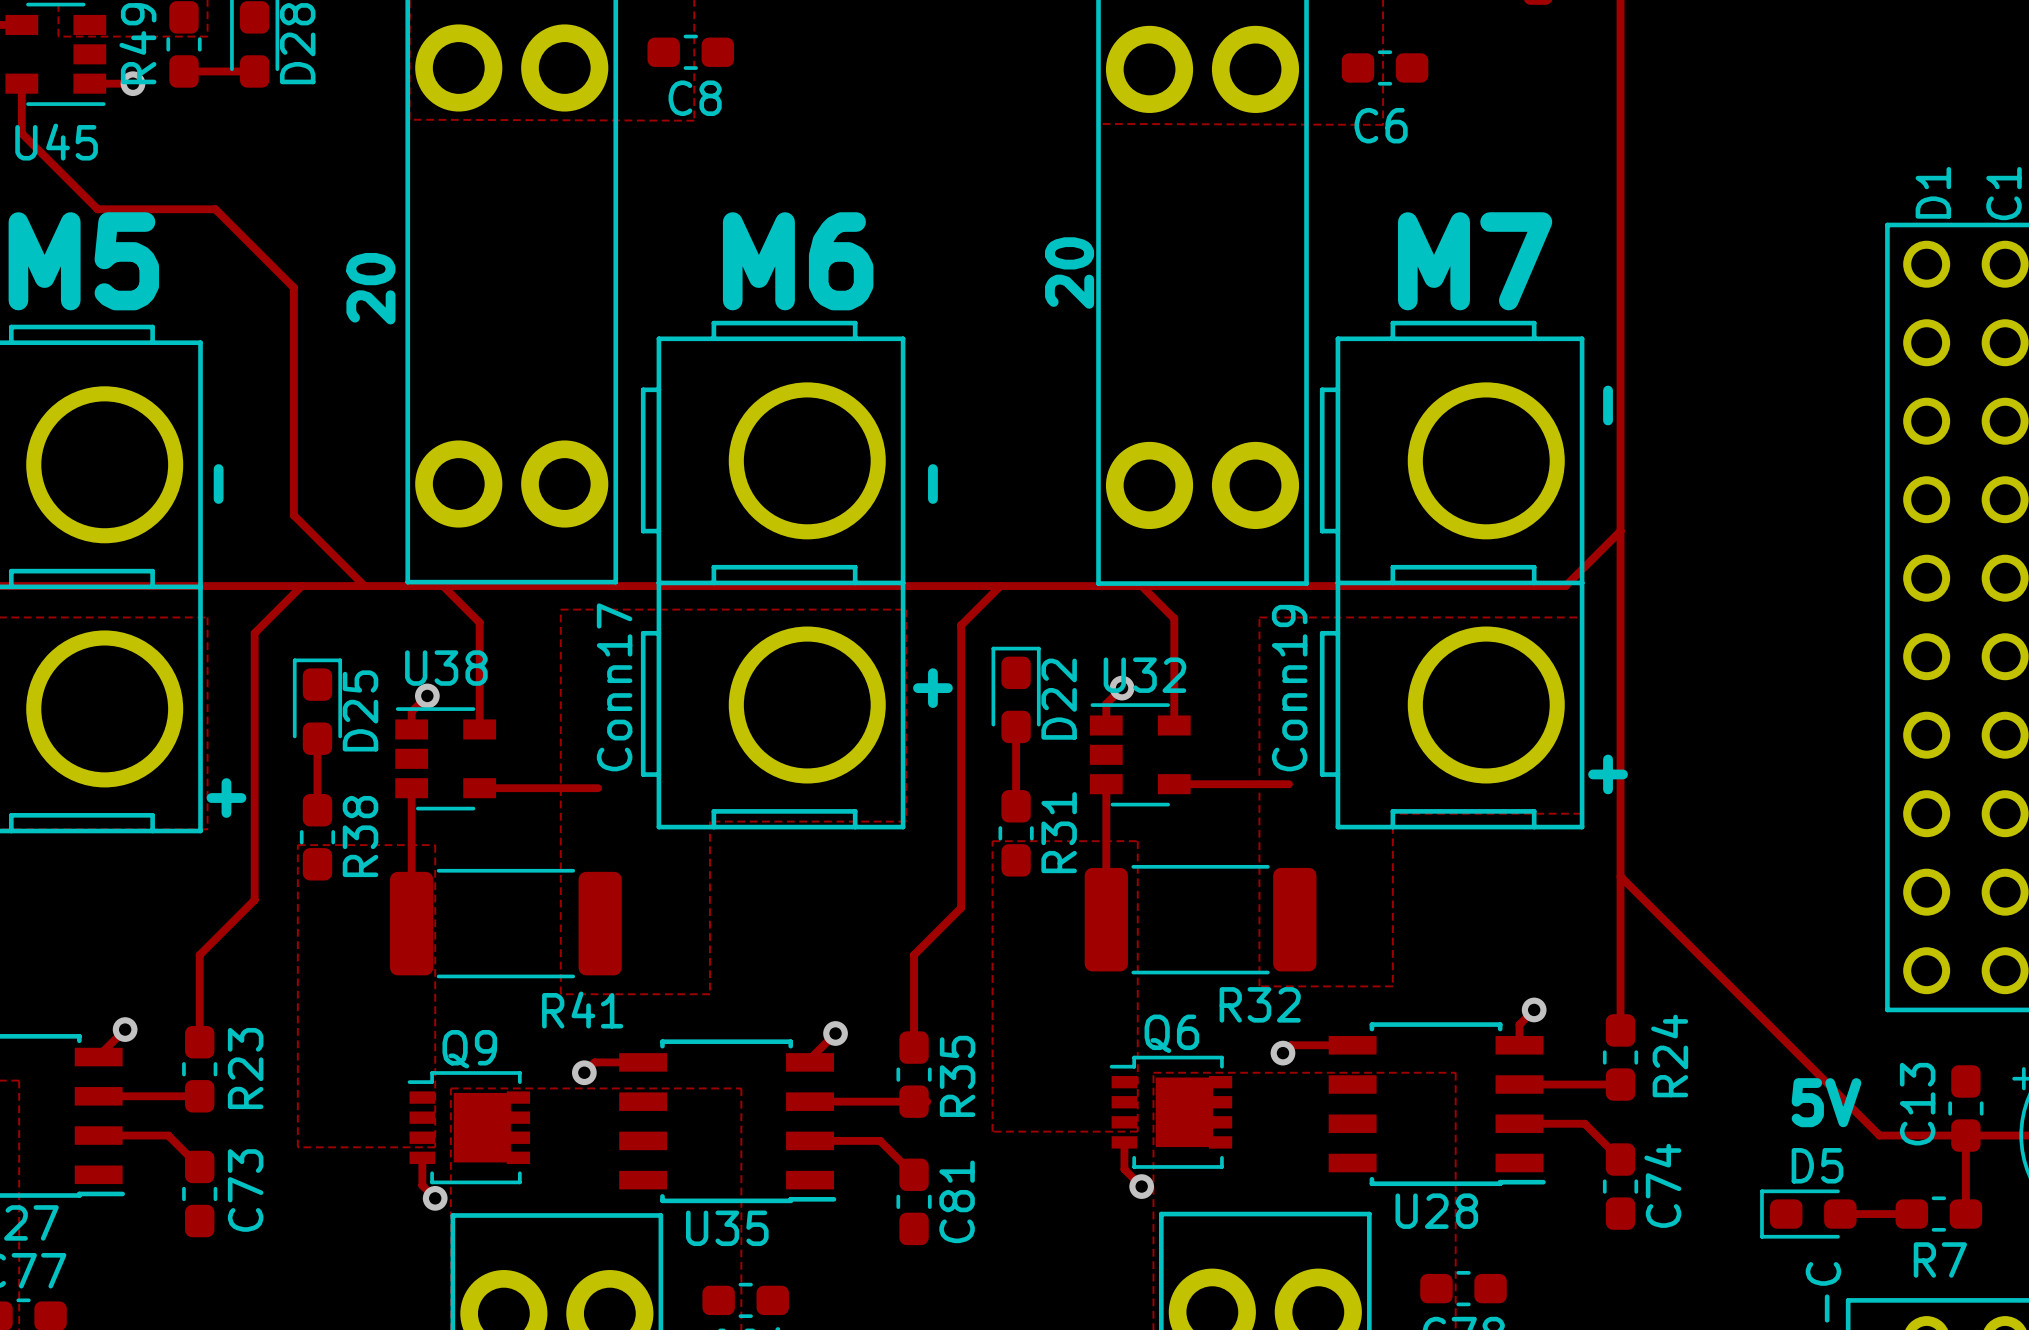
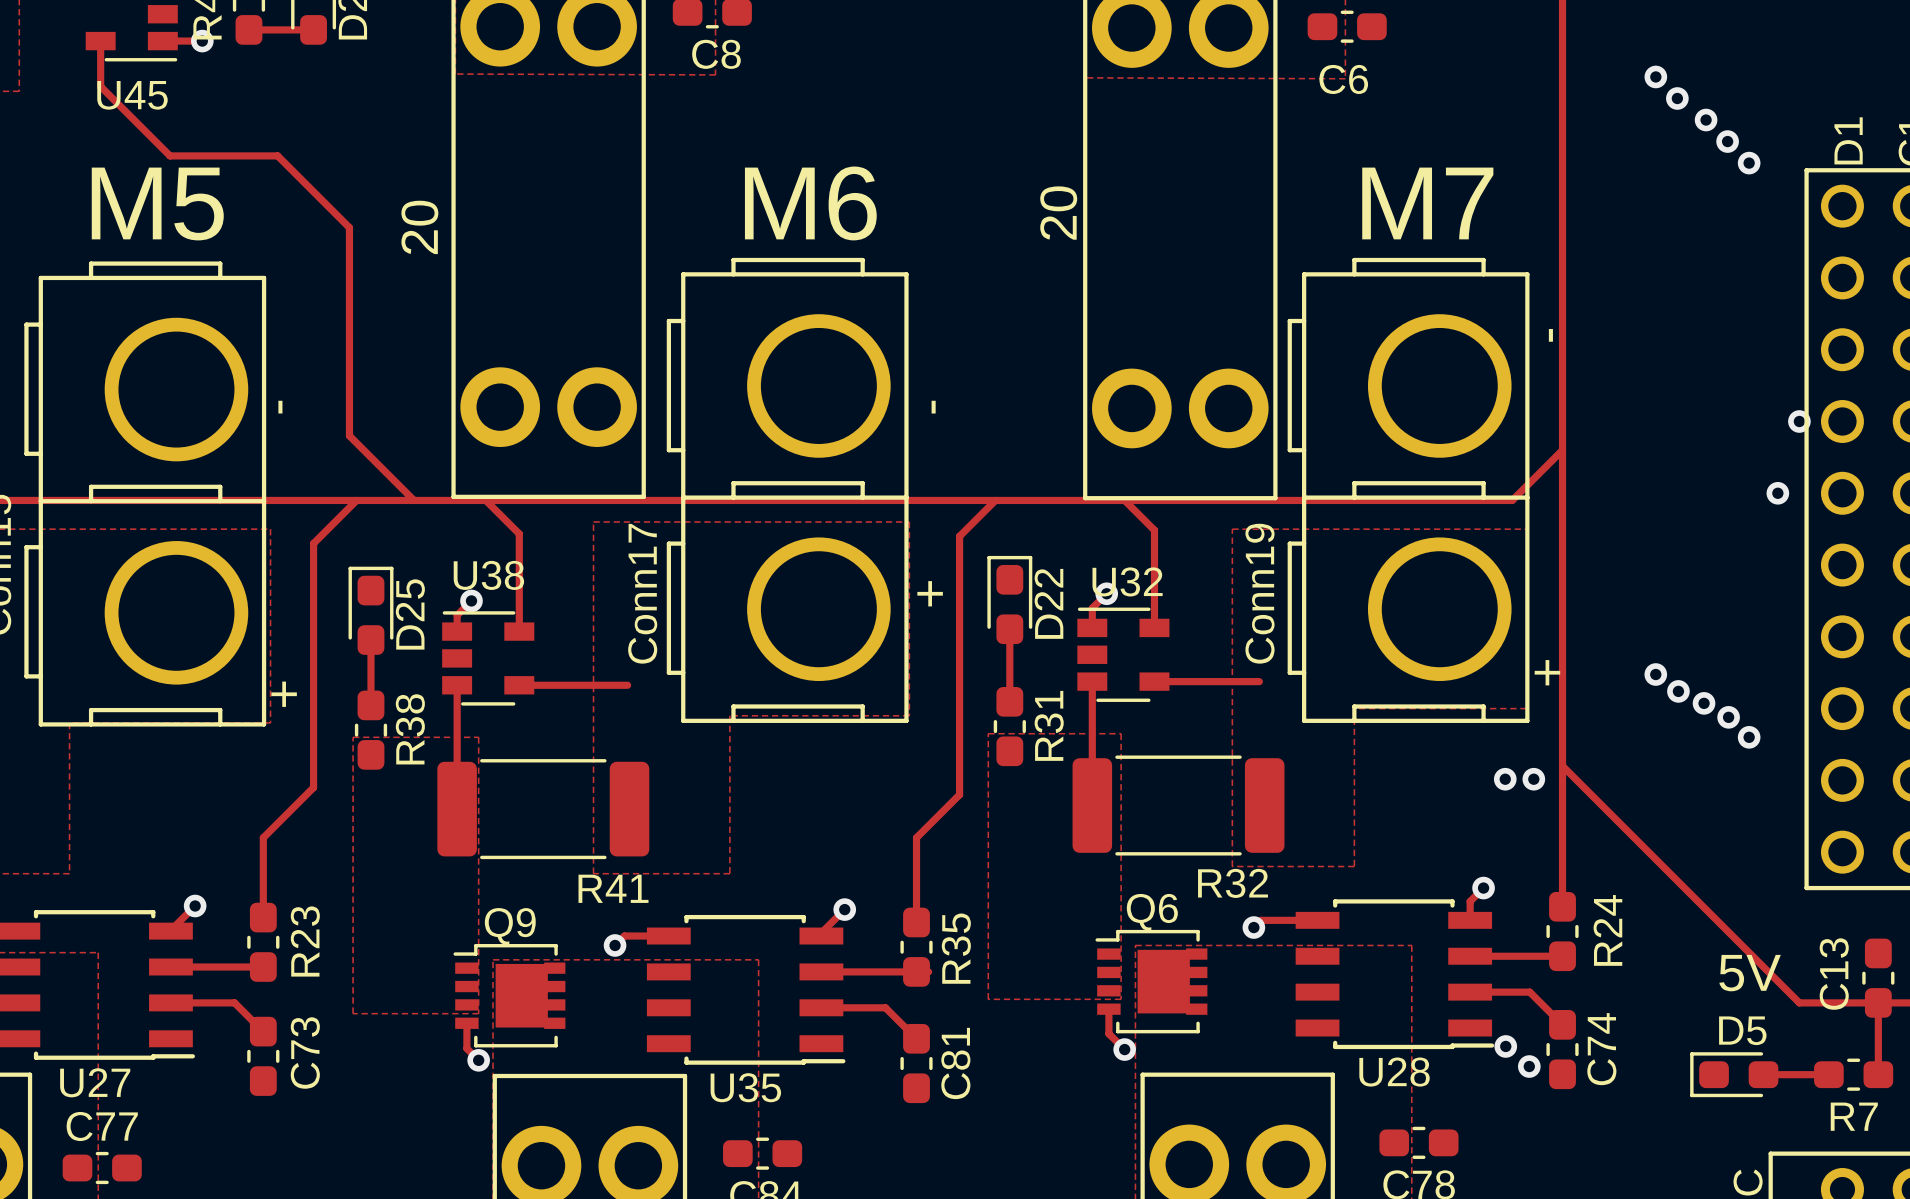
via: none -> (1655, 76)
via: none -> (1677, 98)
via: none -> (1706, 120)
via: none -> (1727, 141)
via: none -> (1749, 163)
via: none -> (1799, 421)
via: none -> (1777, 493)
via: none -> (1655, 674)
via: none -> (1678, 691)
via: none -> (1704, 703)
via: none -> (1728, 717)
via: none -> (1749, 737)
via: none -> (1505, 779)
via: none -> (1533, 779)
via: none -> (1505, 1046)
via: none -> (1529, 1066)

